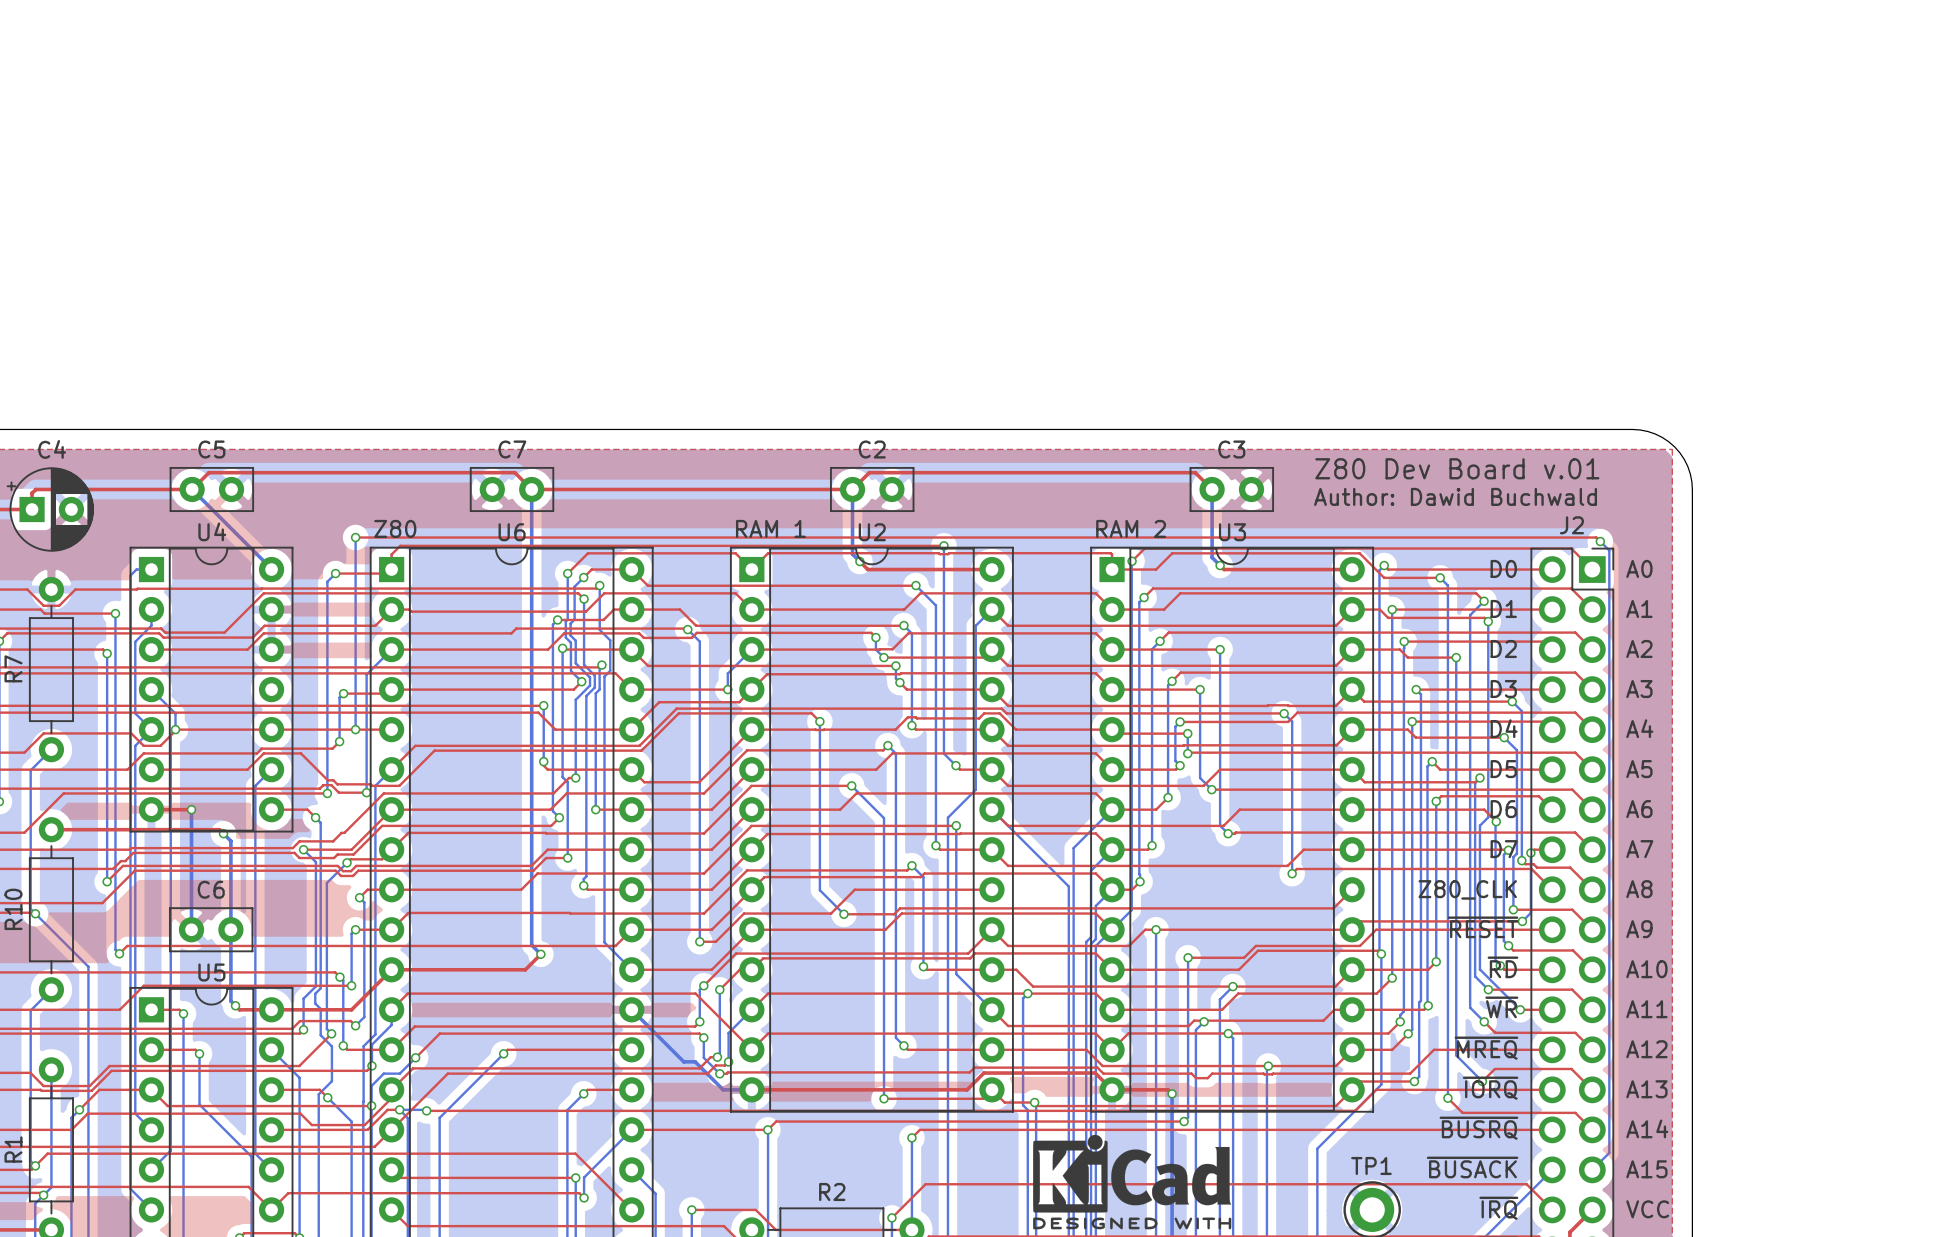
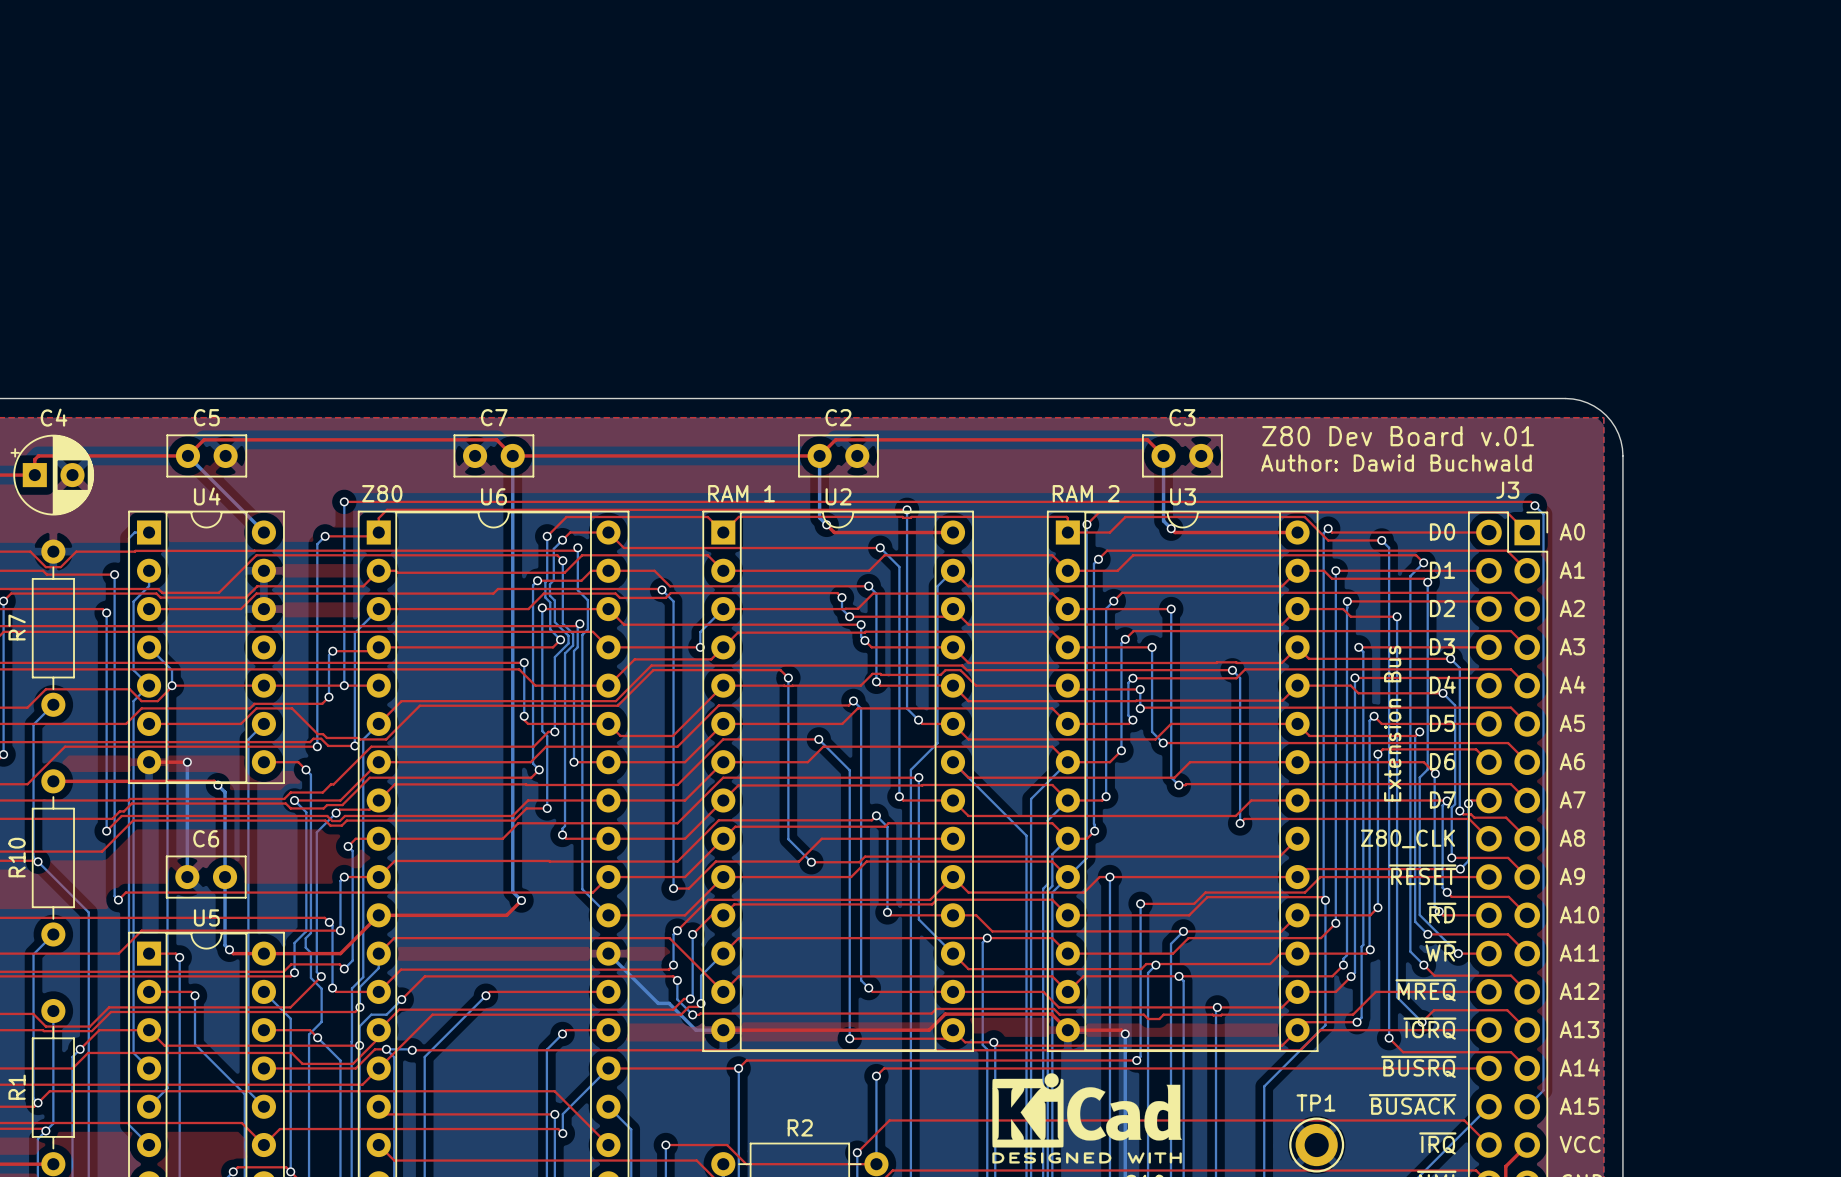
J2 name: J2 (1571, 525) -> J3 (1507, 490)
text: none -> Extension Bus (1392, 723)

